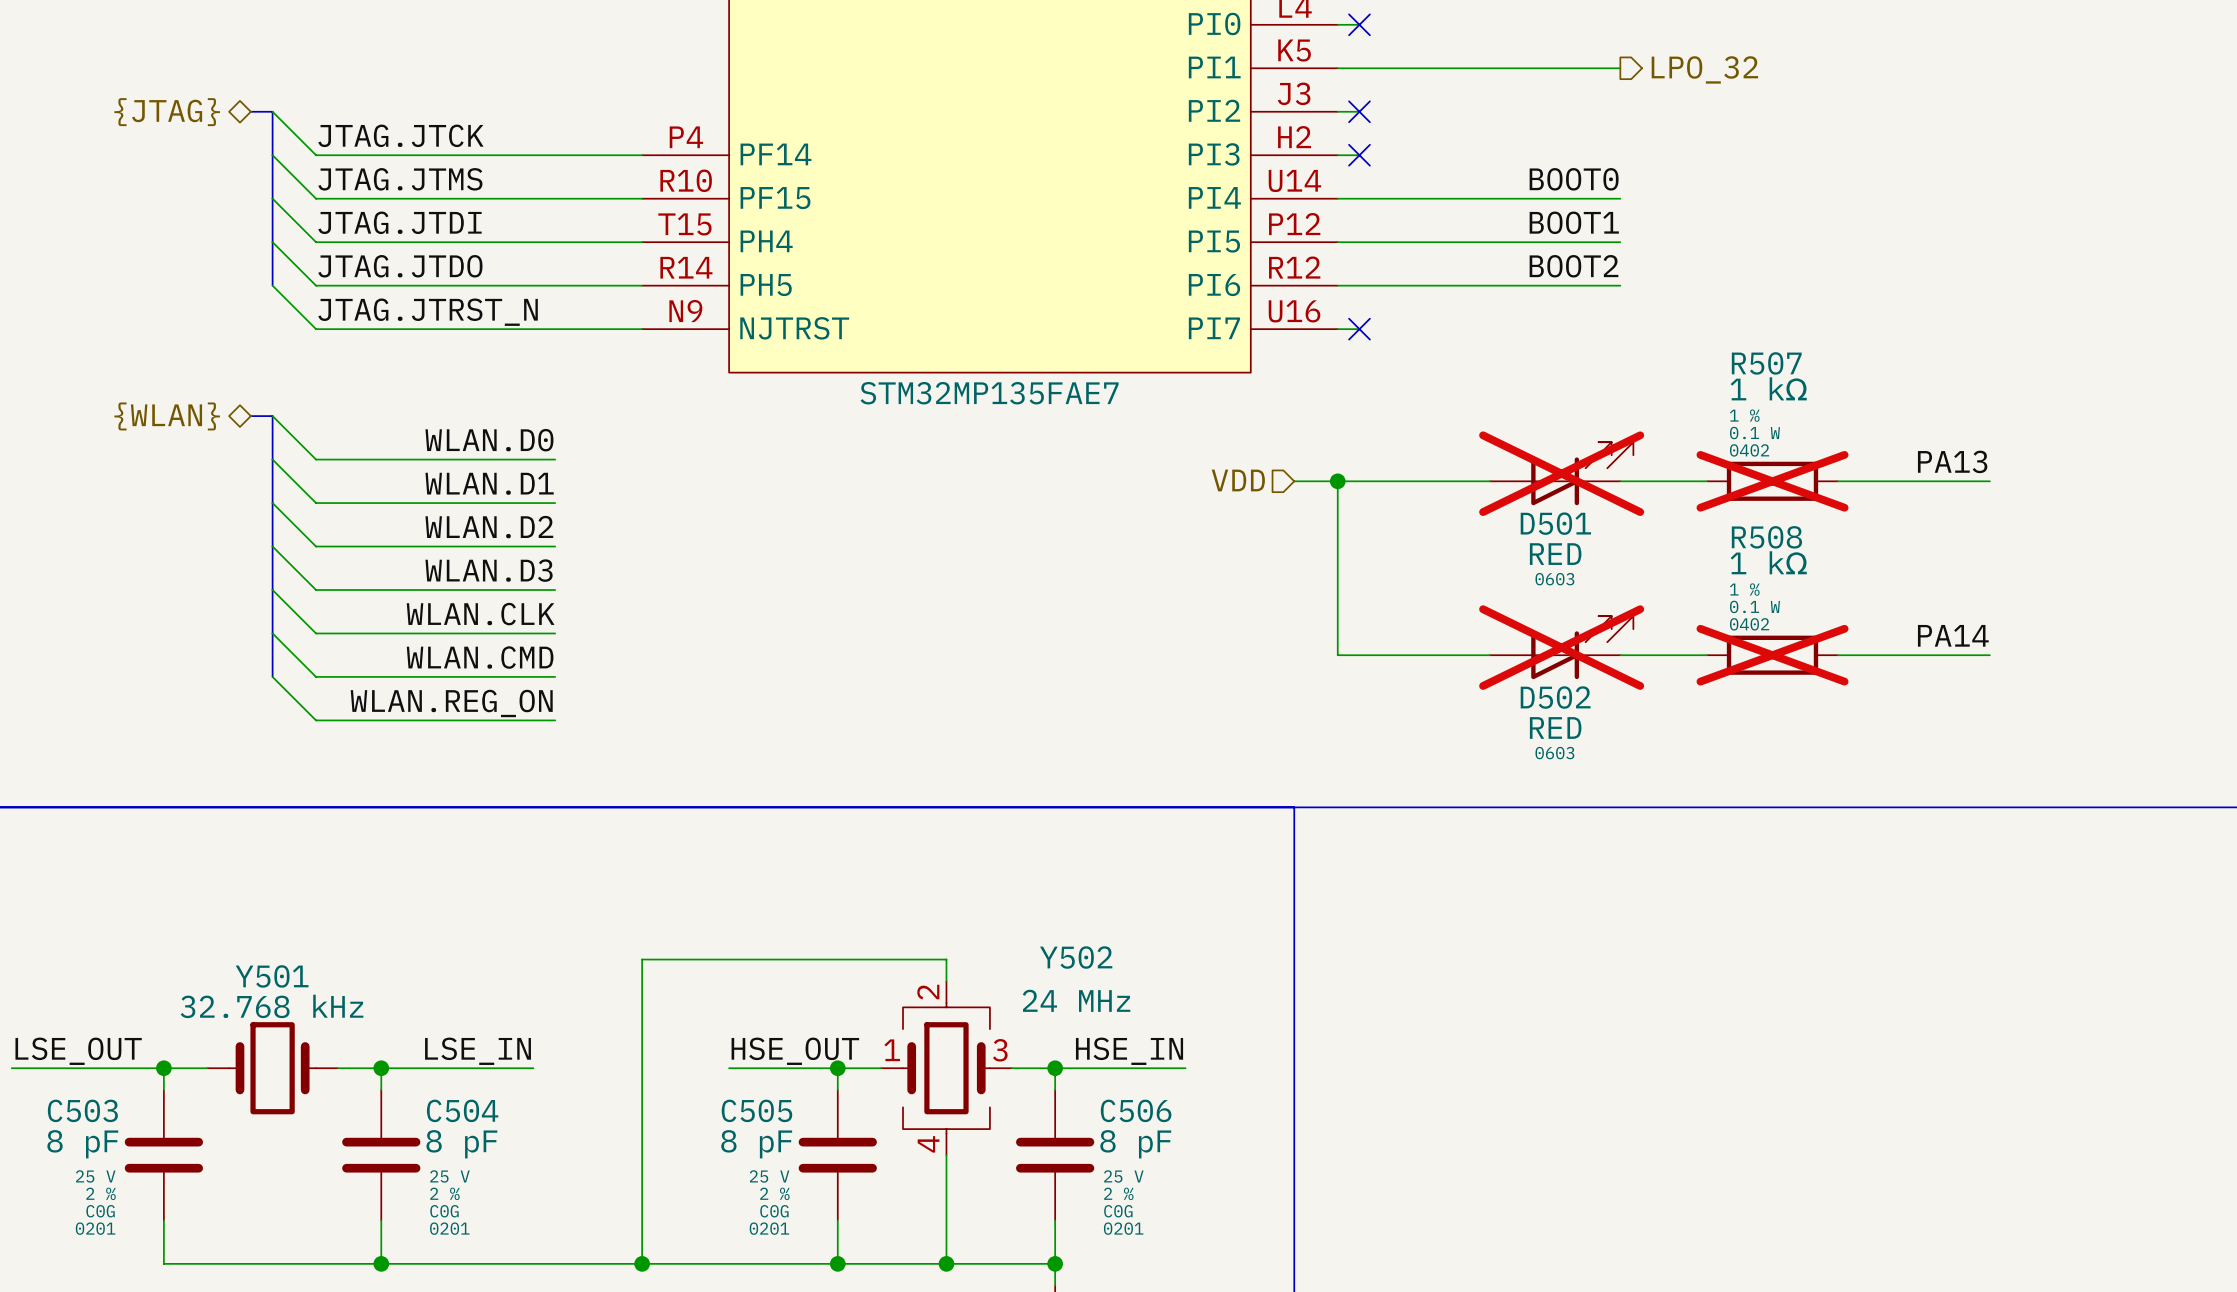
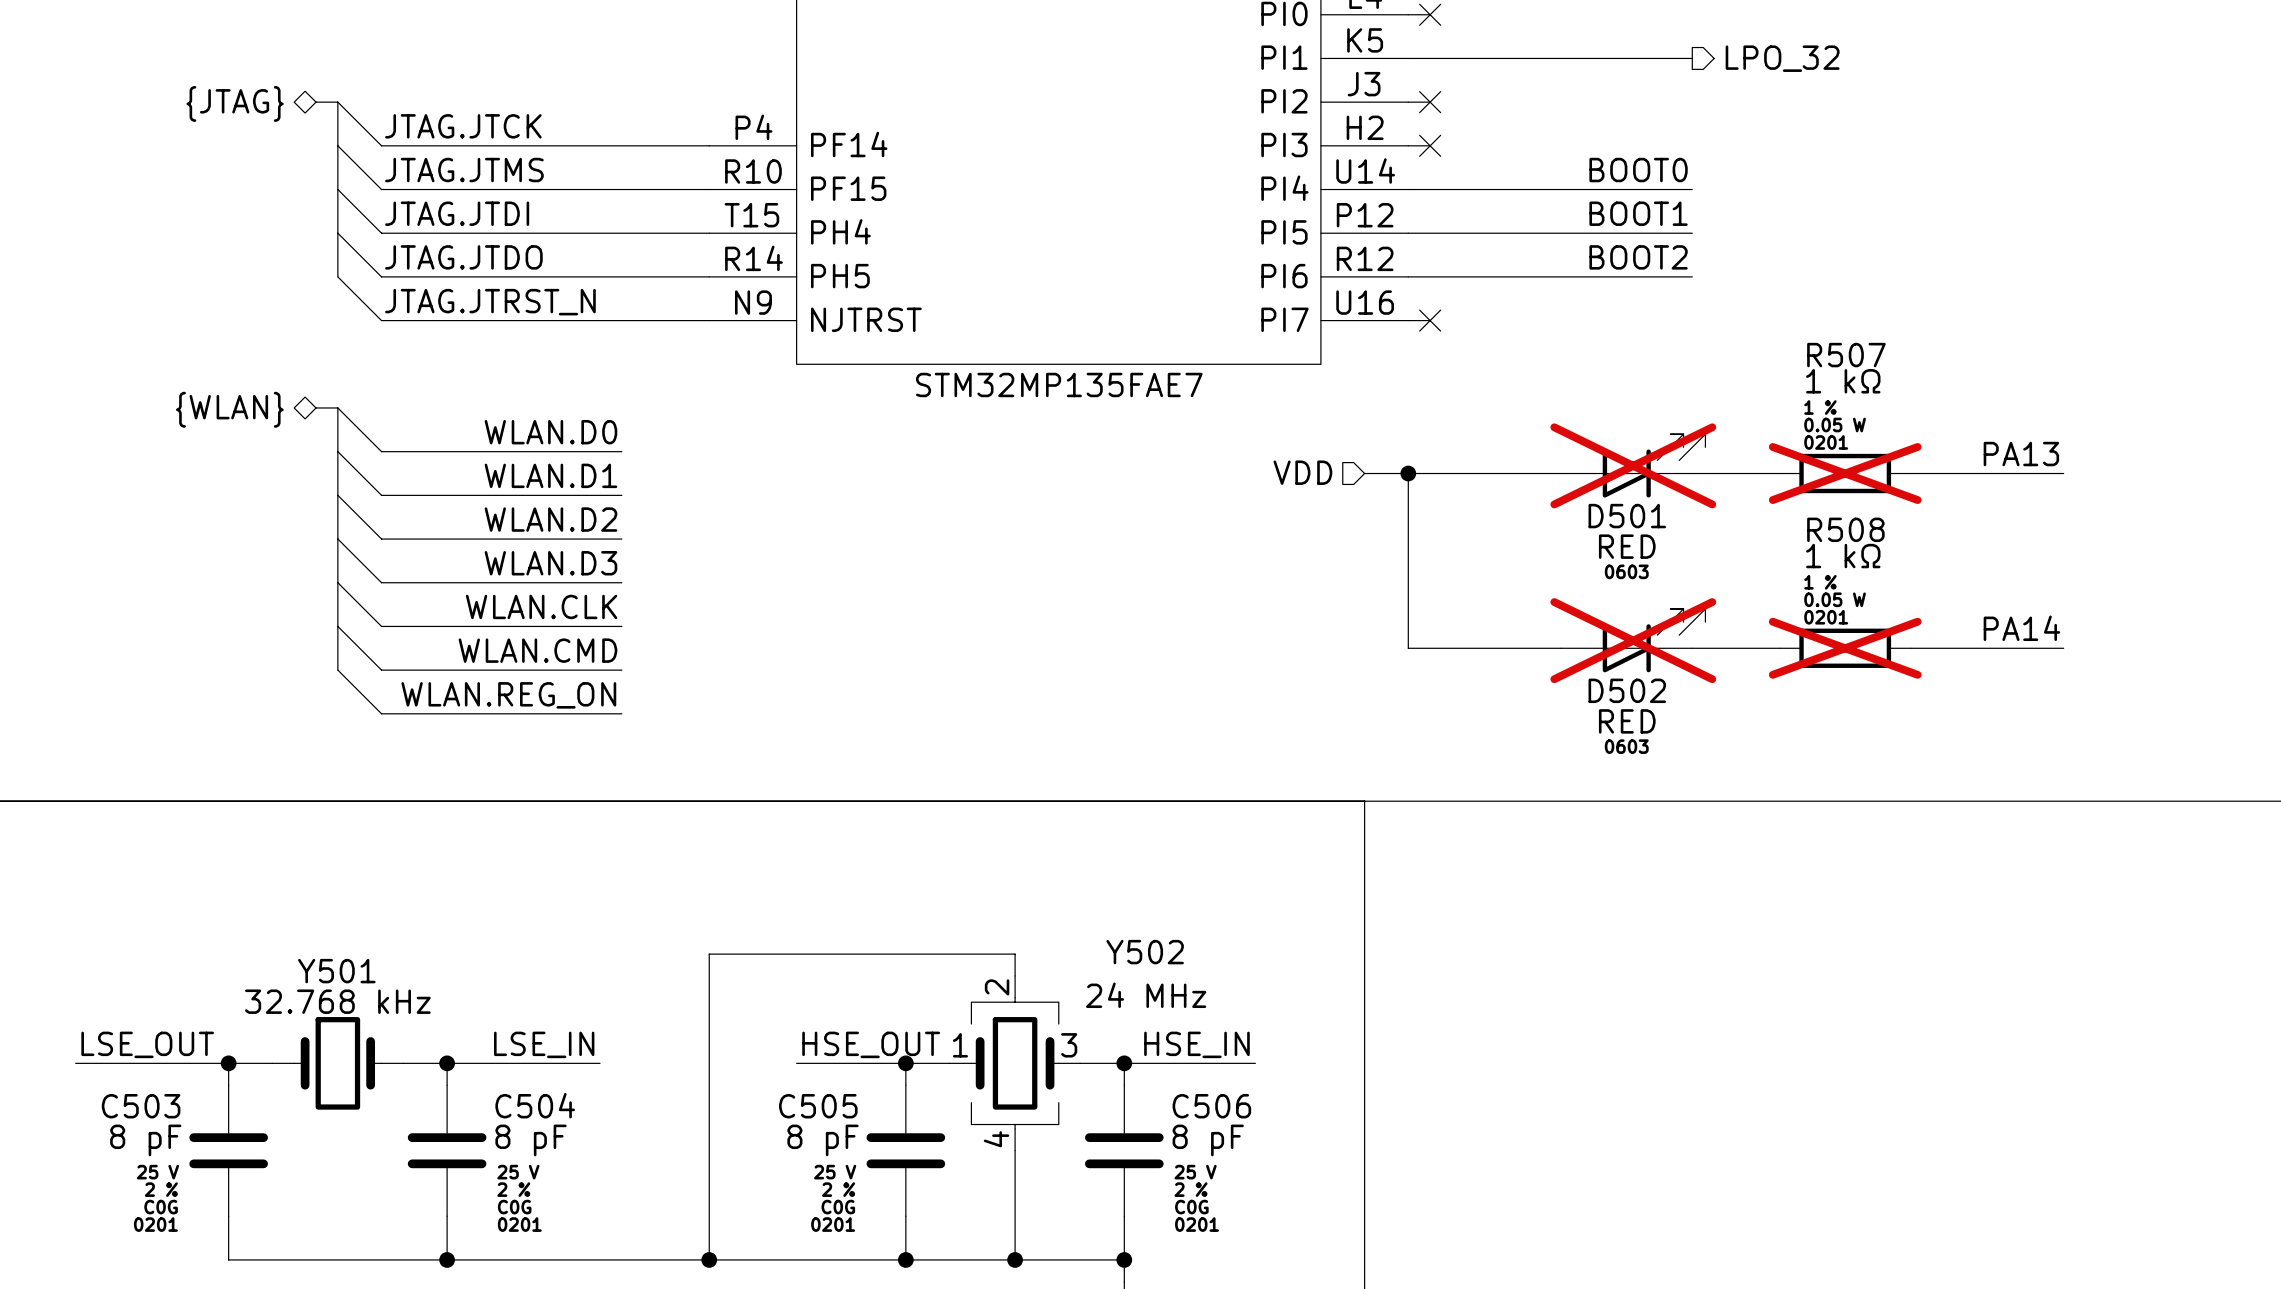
R507 text: 0.1 W (1754, 433) -> 0.05 W (1835, 425)
R507 text: 0402 (1749, 450) -> 0201 (1826, 442)
R508 text: 0.1 W (1754, 606) -> 0.05 W (1835, 599)
R508 text: 0402 (1749, 624) -> 0201 (1826, 617)

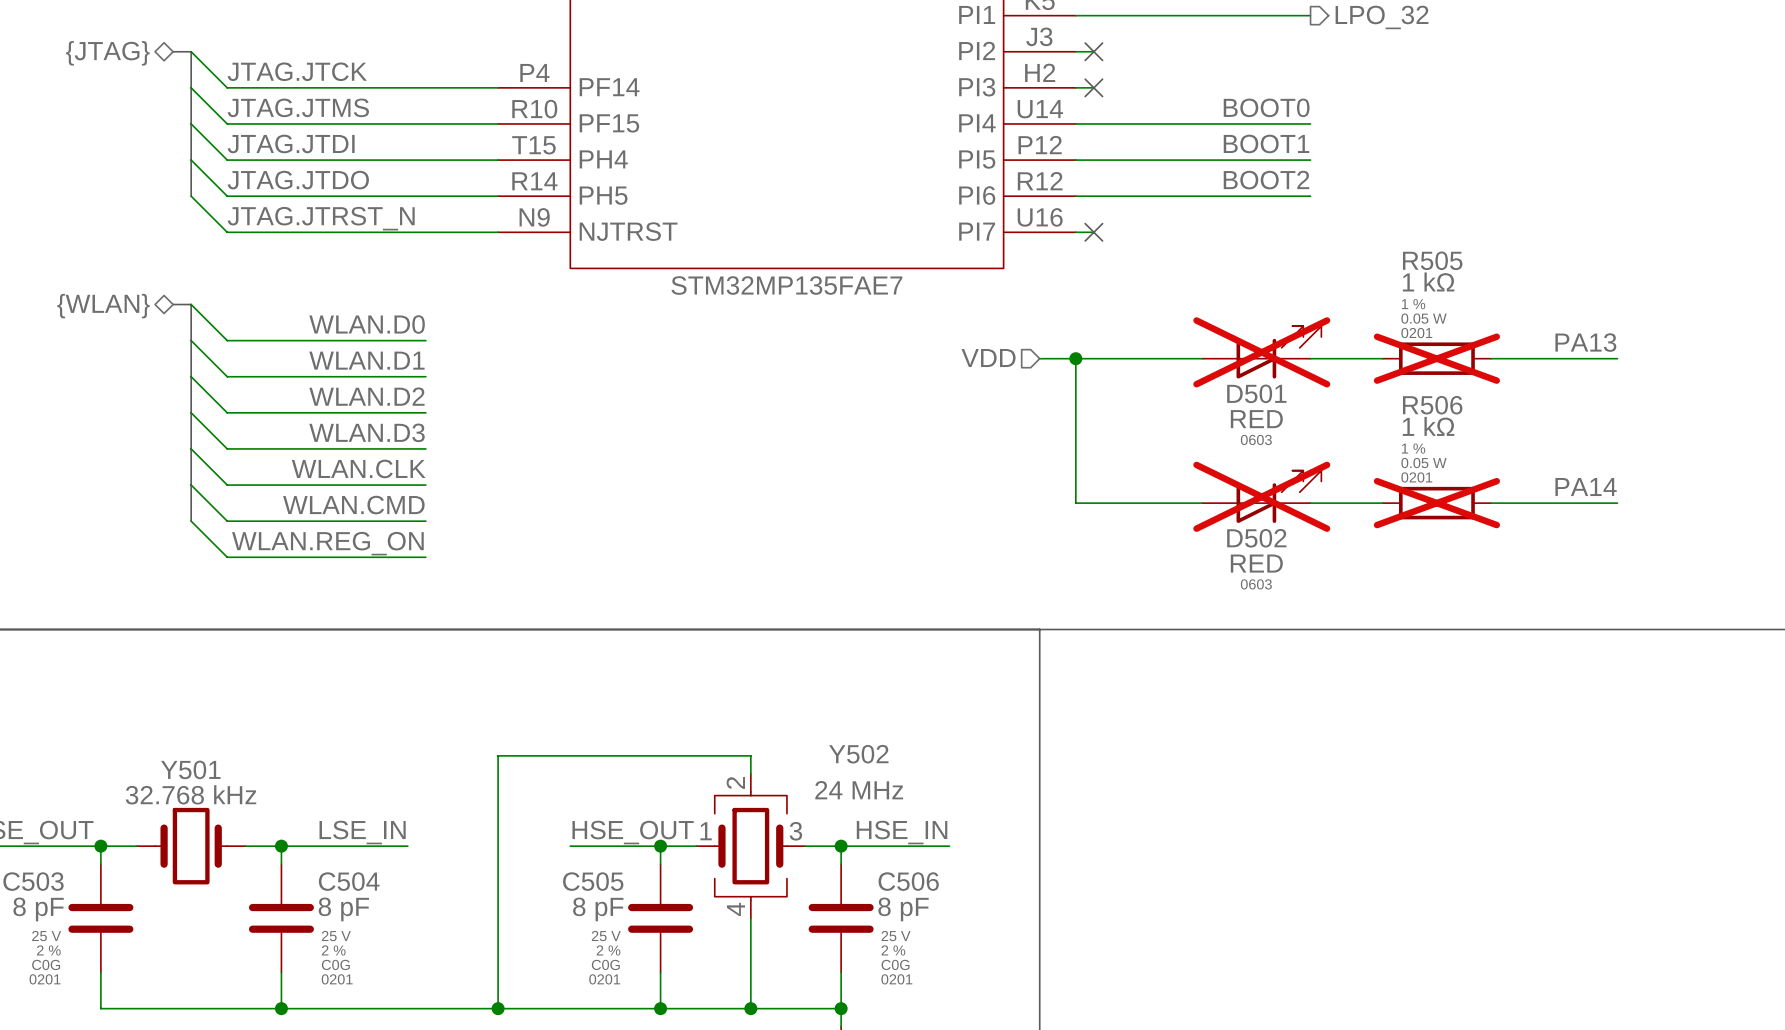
R507 name: R507 (1846, 355) -> R505 (1432, 260)
R508 name: R508 (1845, 529) -> R506 (1432, 405)

